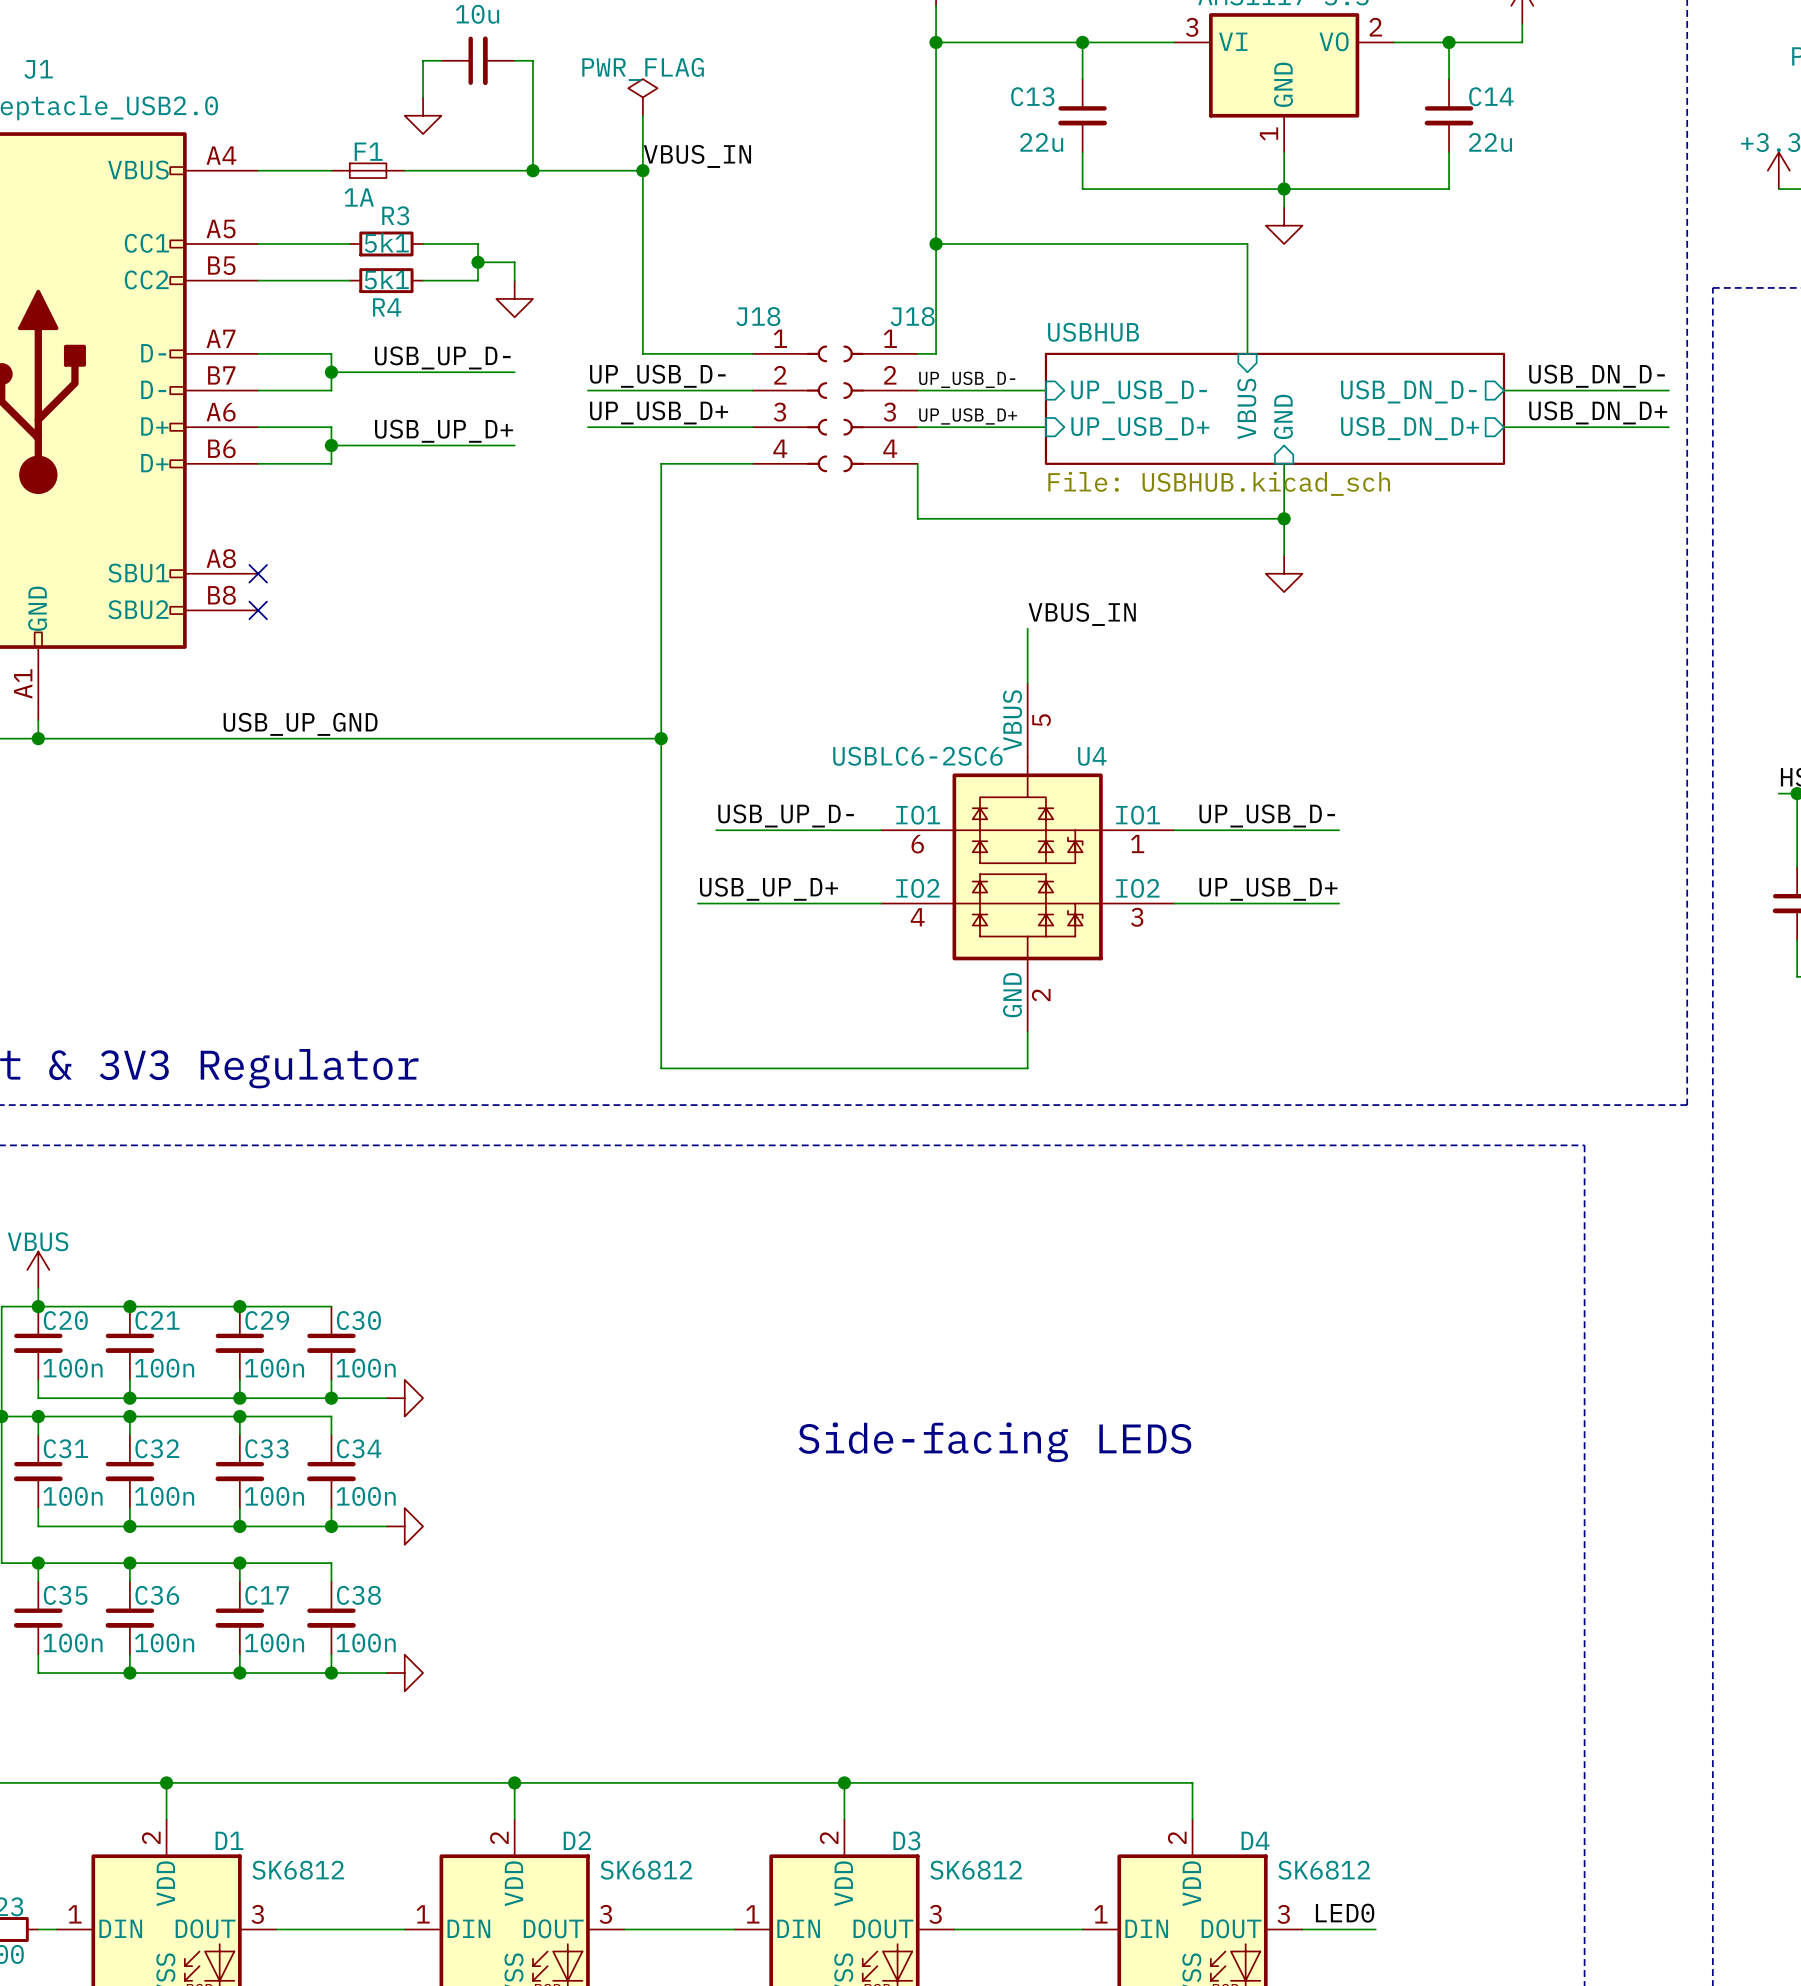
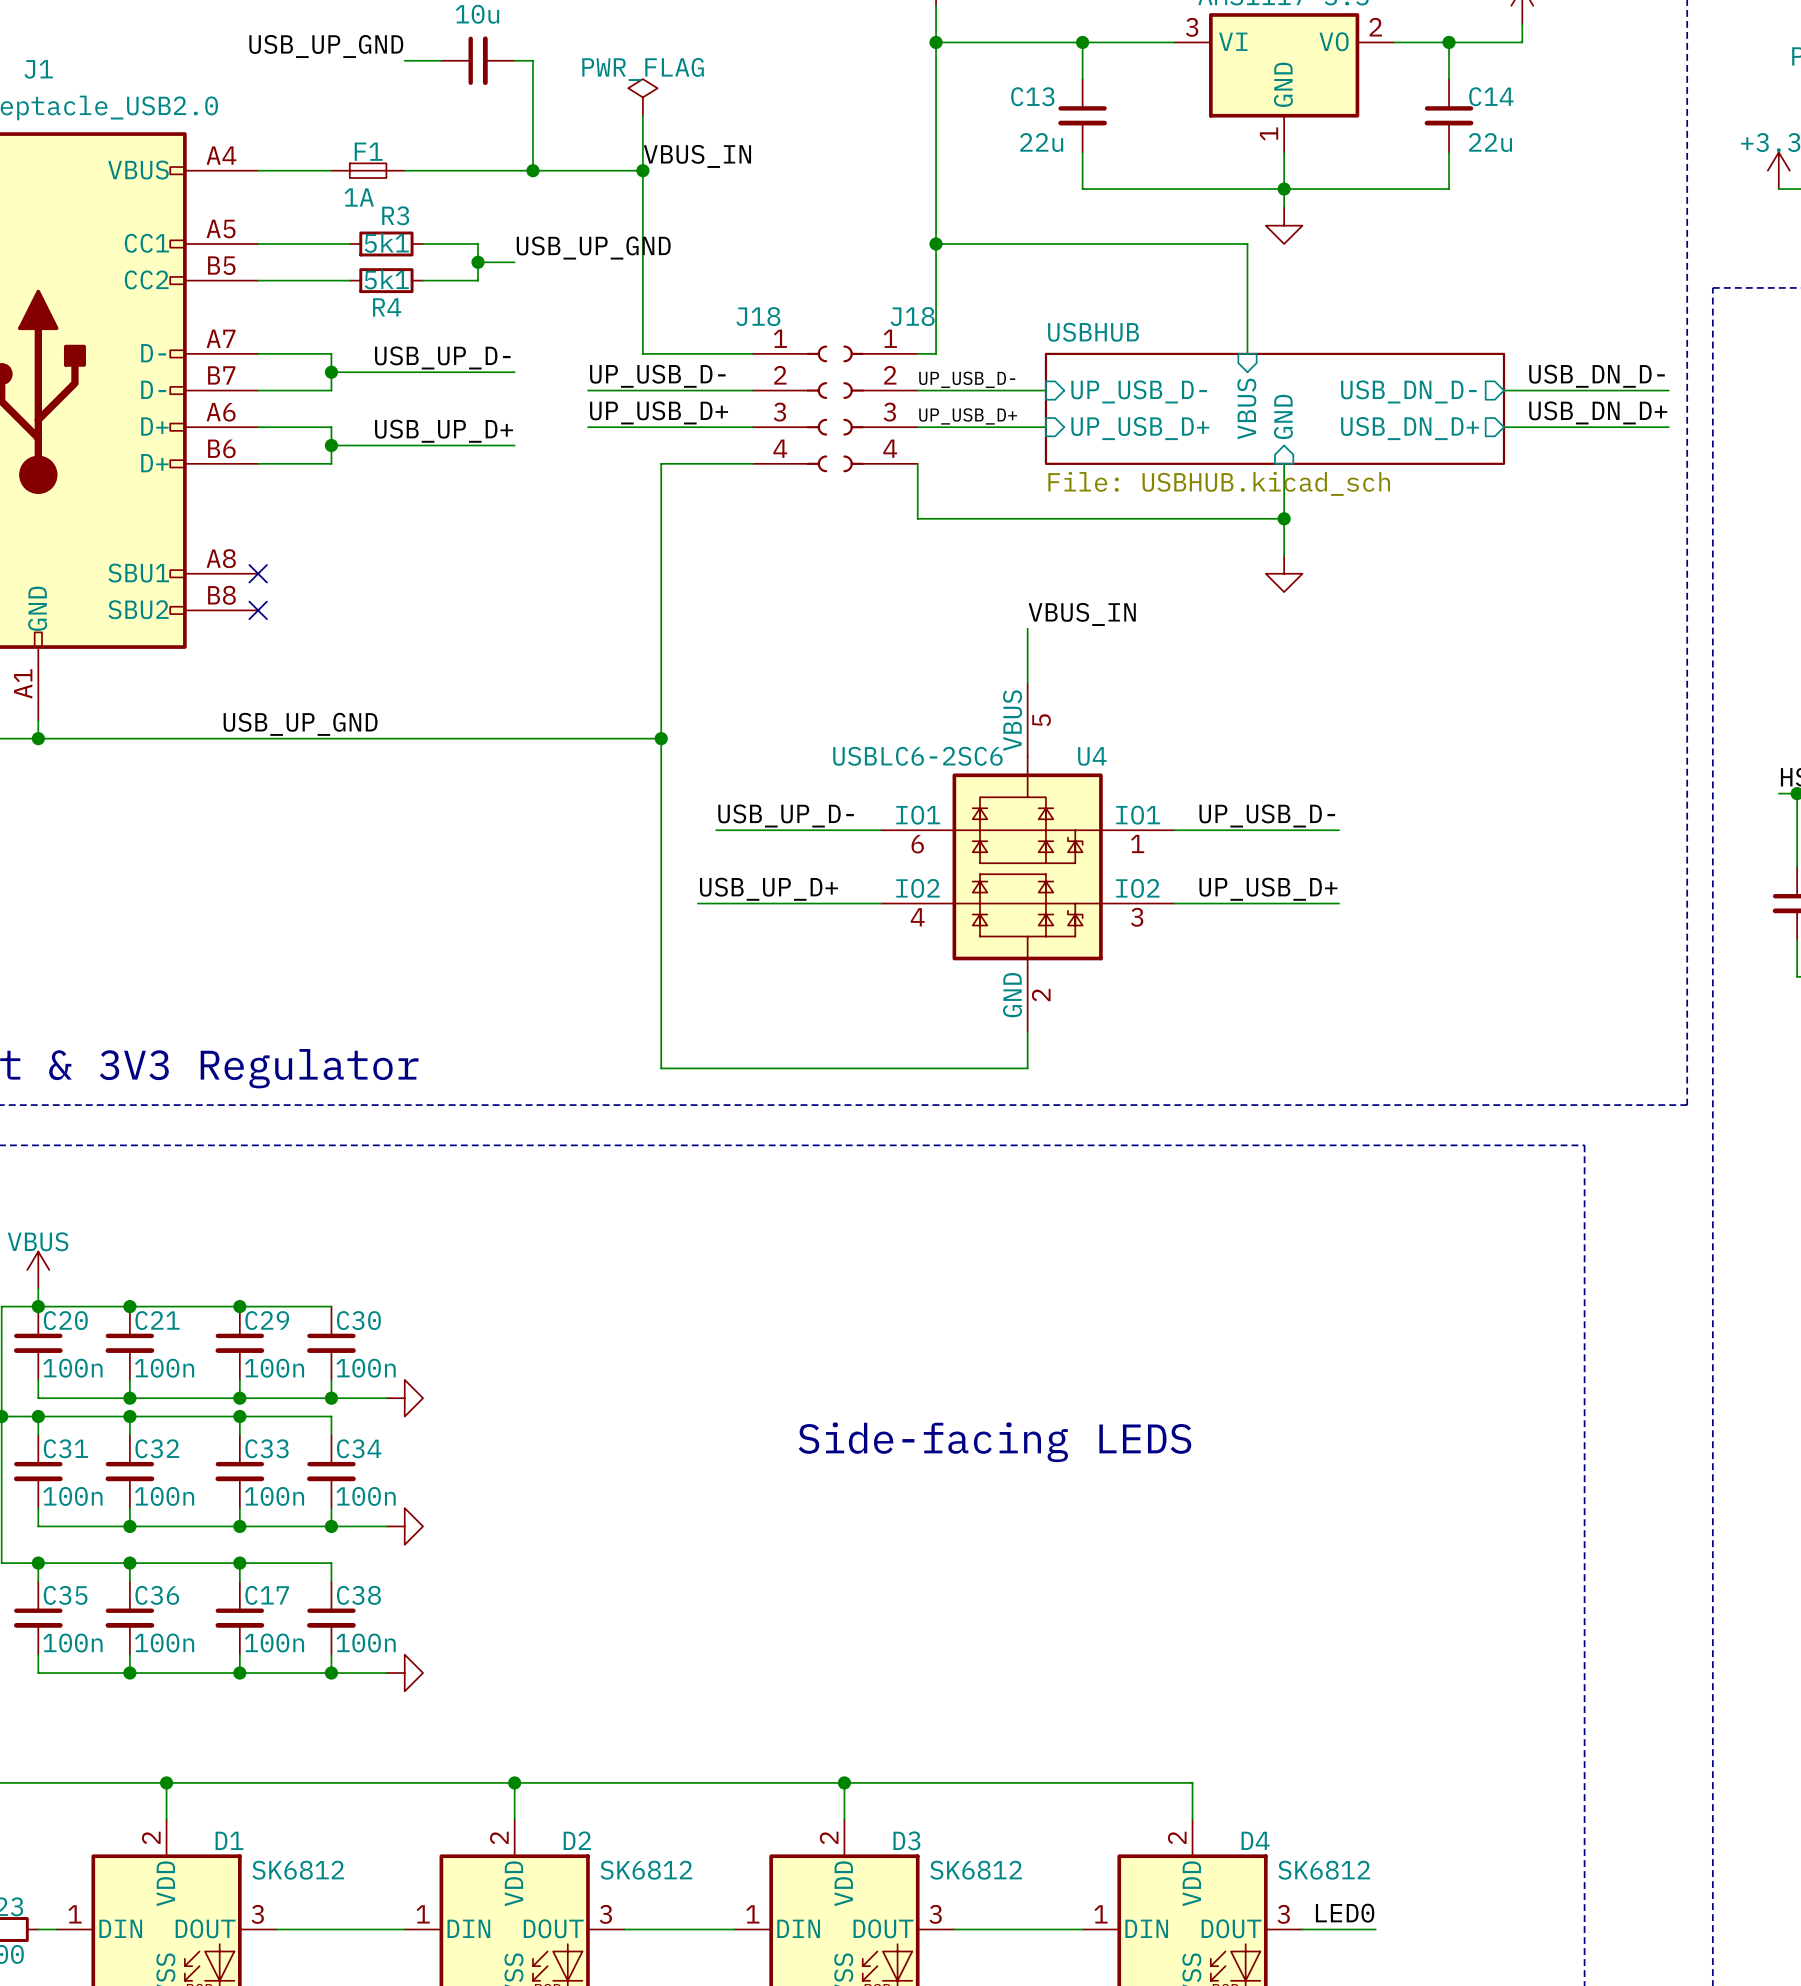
label: none -> USB_UP_GND (326, 46)
wire: (423, 60) (423, 97) -> (423, 60) (404, 60)
power symbol: (423, 115) -> none
label: none -> USB_UP_GND (593, 248)
wire: (514, 262) (514, 280) -> none
power symbol: (514, 298) -> none

